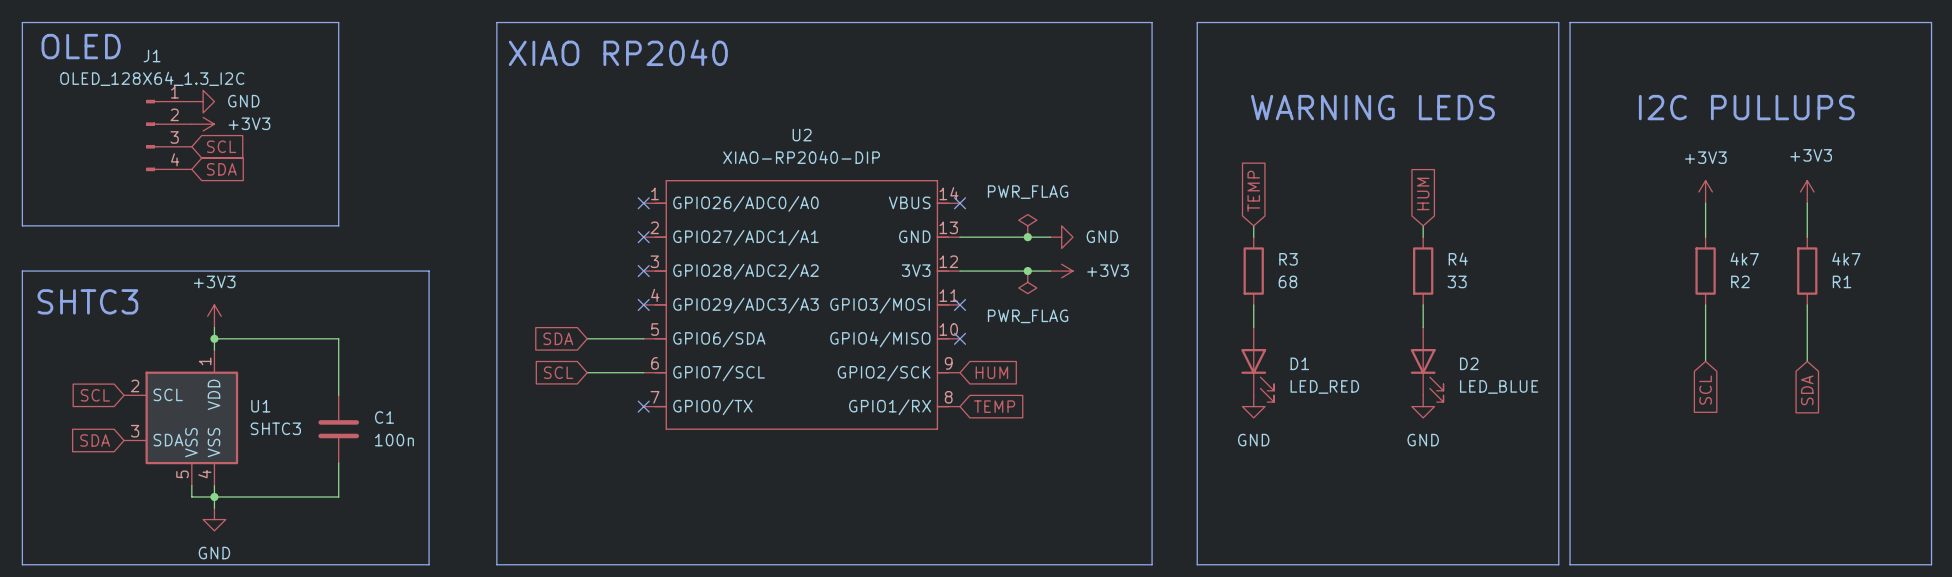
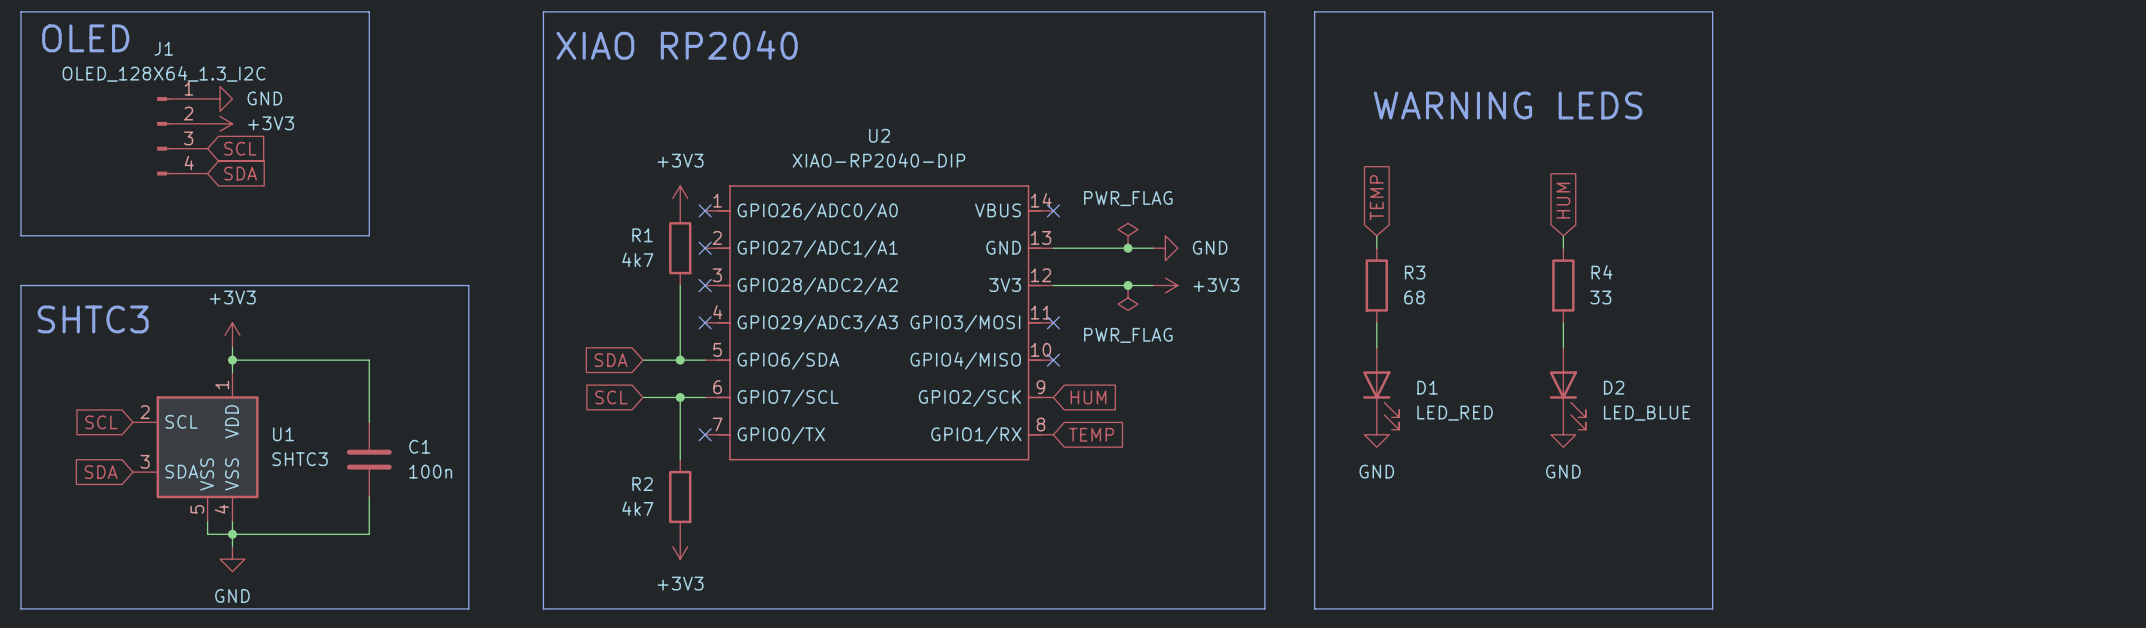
line: (1570, 22) (1931, 22) (1931, 564) (1570, 564) (1570, 22) -> none
text: I2C PULLUPS (1746, 107) -> none
power symbol: none -> +3V3 (680, 198)
power symbol: +3V3 (1705, 191) -> none
power symbol: +3V3 (1807, 191) -> none
wire: (1705, 203) (1705, 237) -> none
wire: (1807, 203) (1807, 237) -> none
R2 value position: 4k7 (1744, 259) -> 4k7 (637, 508)
R1 value position: 4k7 (1846, 259) -> 4k7 (637, 259)
wire: none -> (680, 285) (680, 360)
R2 position: (1705, 271) -> (680, 496)
R1 position: (1807, 271) -> (680, 248)
R2 name position: R2 (1740, 281) -> R2 (642, 484)
R1 name position: R1 (1842, 281) -> R1 (642, 235)
wire: (1705, 304) (1705, 361) -> none
wire: (1807, 304) (1807, 361) -> none
junction: none -> (680, 360)
wire: none -> (680, 397) (680, 459)
junction: none -> (680, 397)
global label: SCL (1705, 390) -> none
global label: SDA (1807, 390) -> none
power symbol: none -> +3V3 (680, 546)

